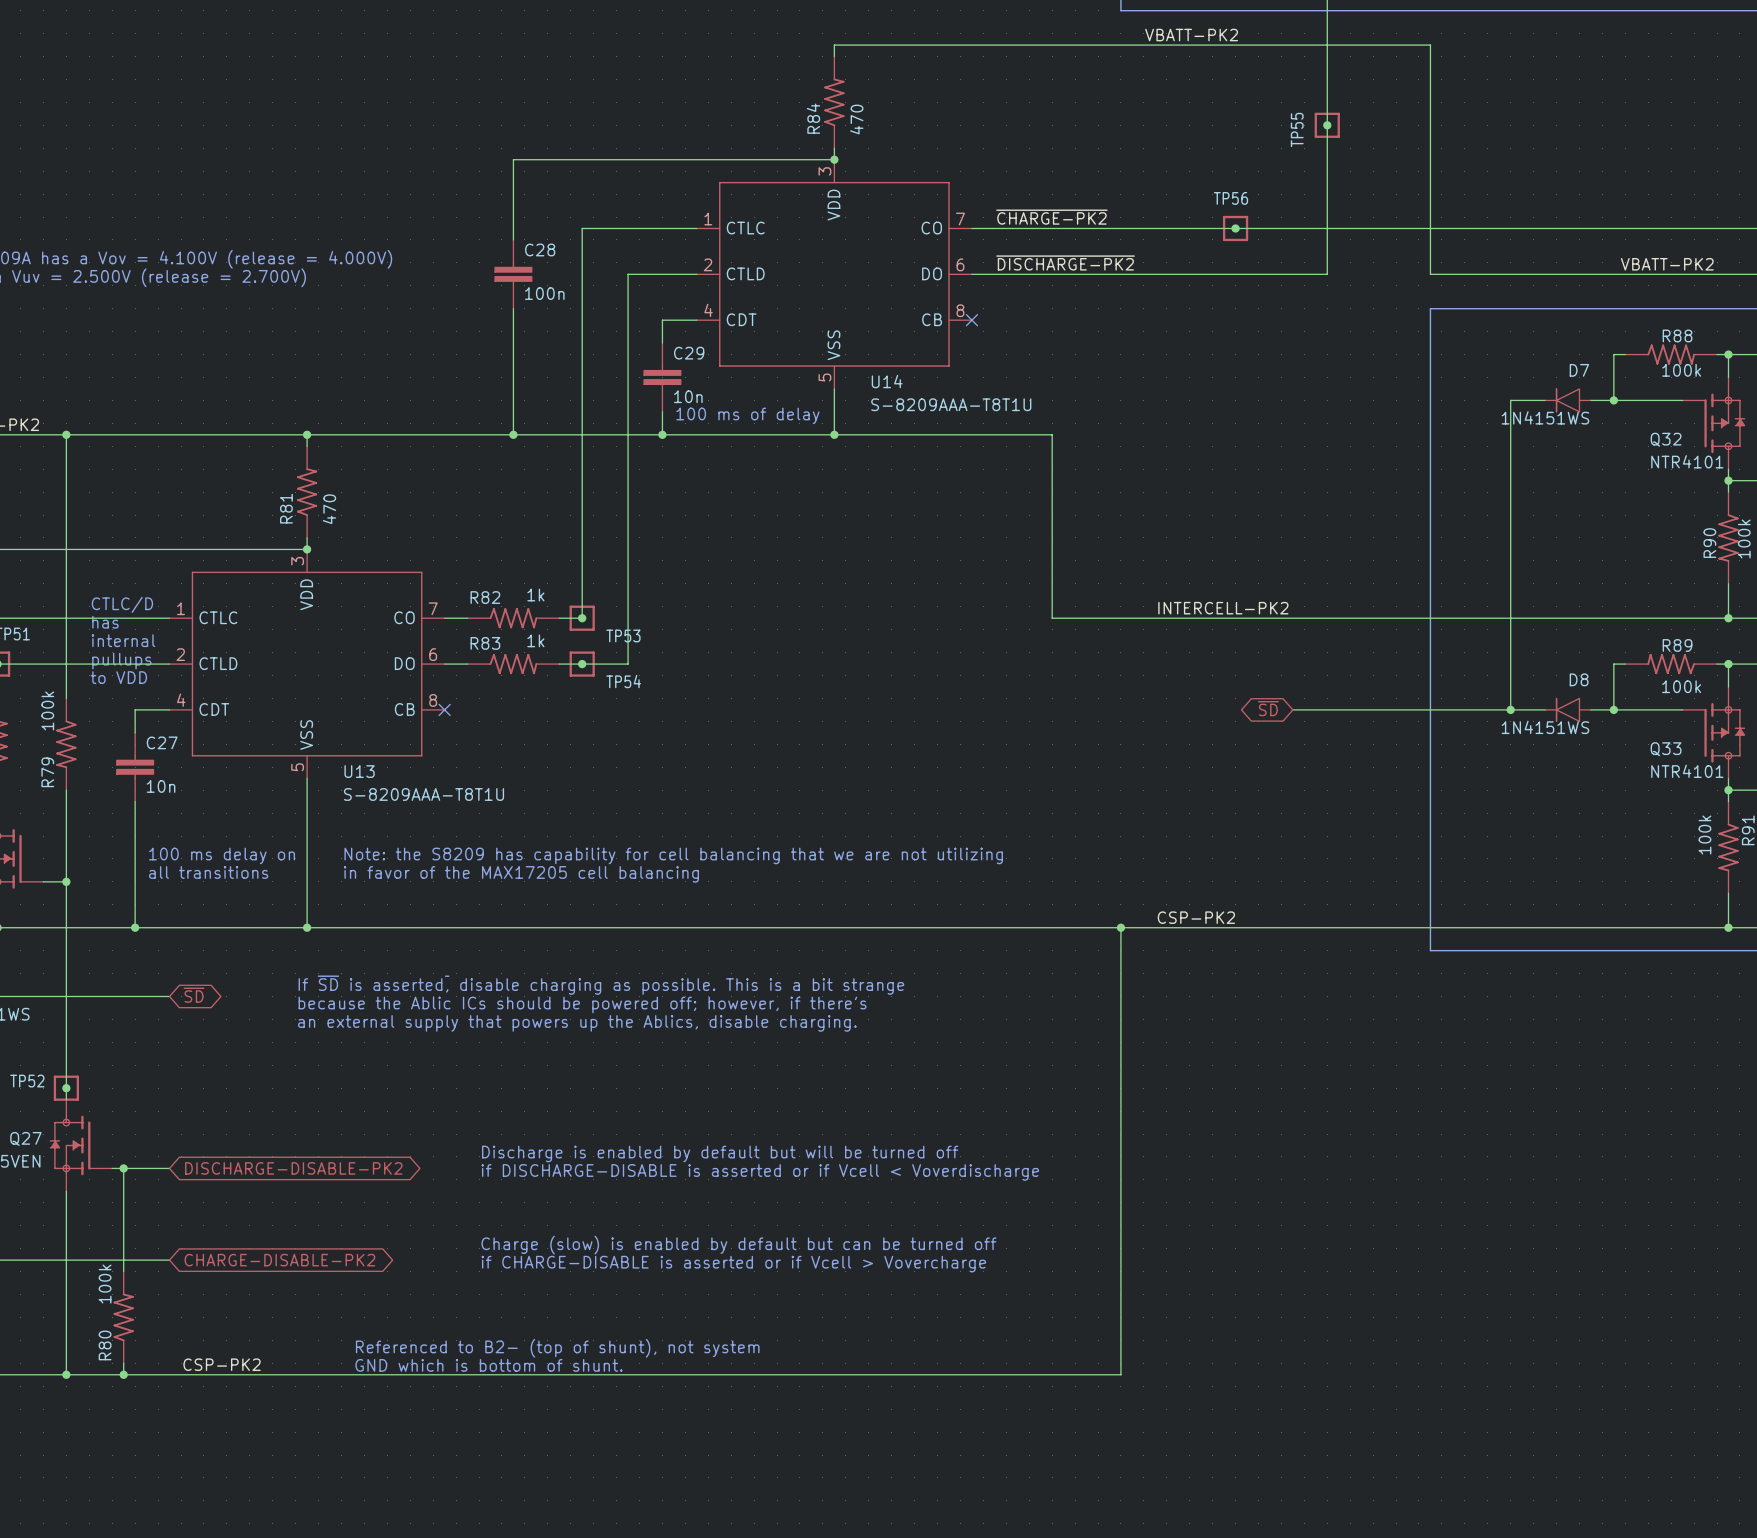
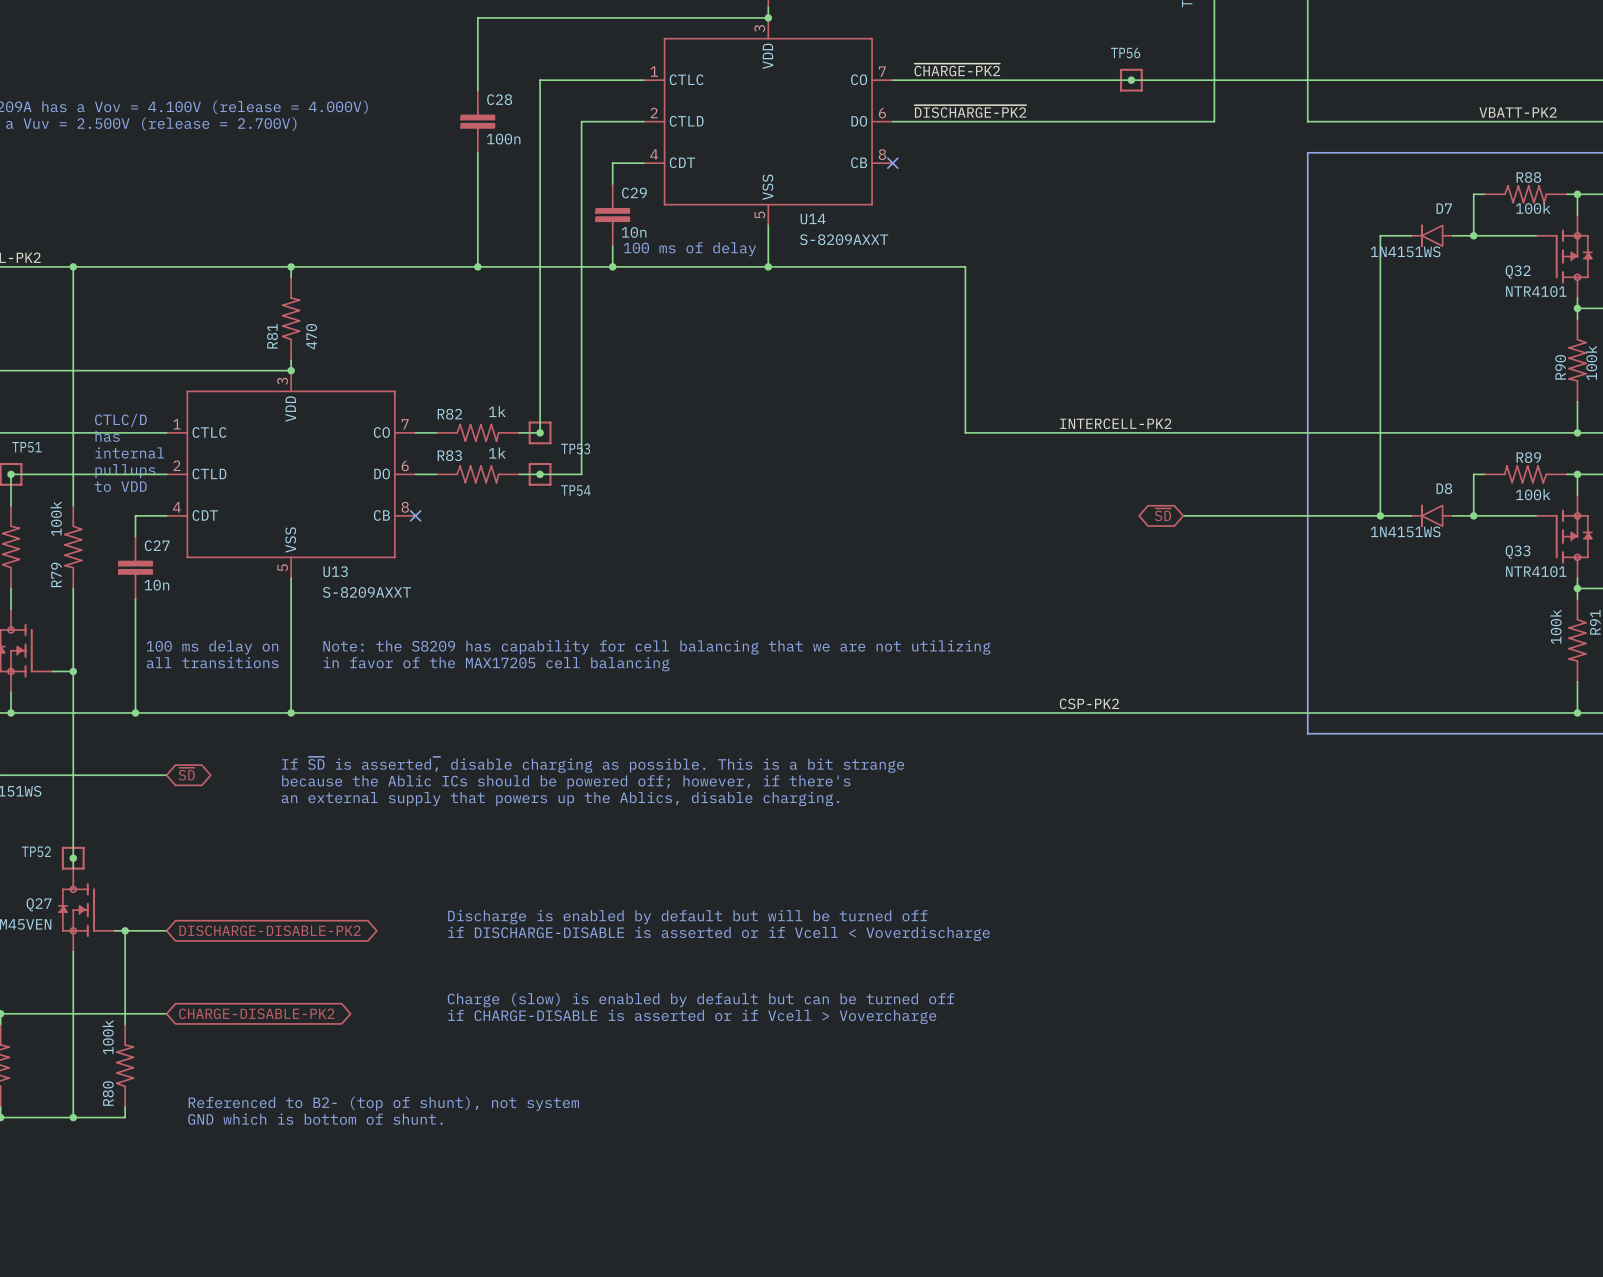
U14 value: S-8209AAA-T8T1U (951, 404) -> S-8209AXXT (844, 239)
U13 value: S-8209AAA-T8T1U (423, 794) -> S-8209AXXT (366, 592)
wire: (1120, 927) (1120, 1374) (123, 1374) -> none
junction: (1120, 927) -> none
text position: Referenced to B2- (top of shunt), not system (557, 1348) -> Referenced to B2- (top of shunt), not system (383, 1103)
label: CSP-PK2 (222, 1364) -> none
text position: GND which is bottom of shunt. (488, 1365) -> GND which is bottom of shunt. (315, 1119)
junction: (123, 1374) -> none

